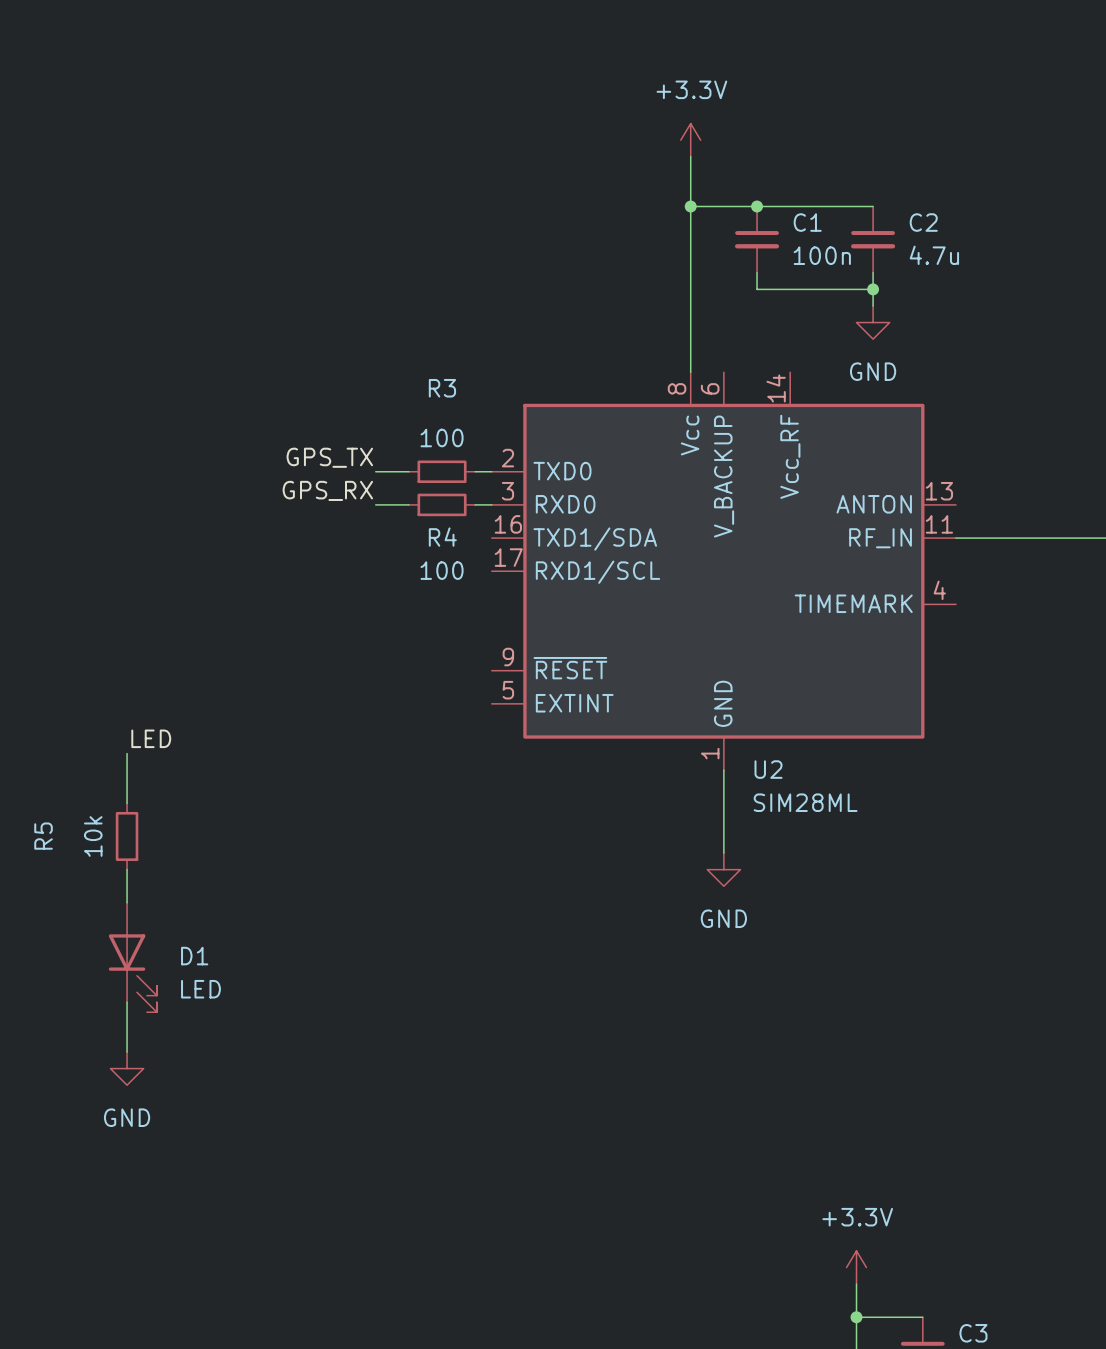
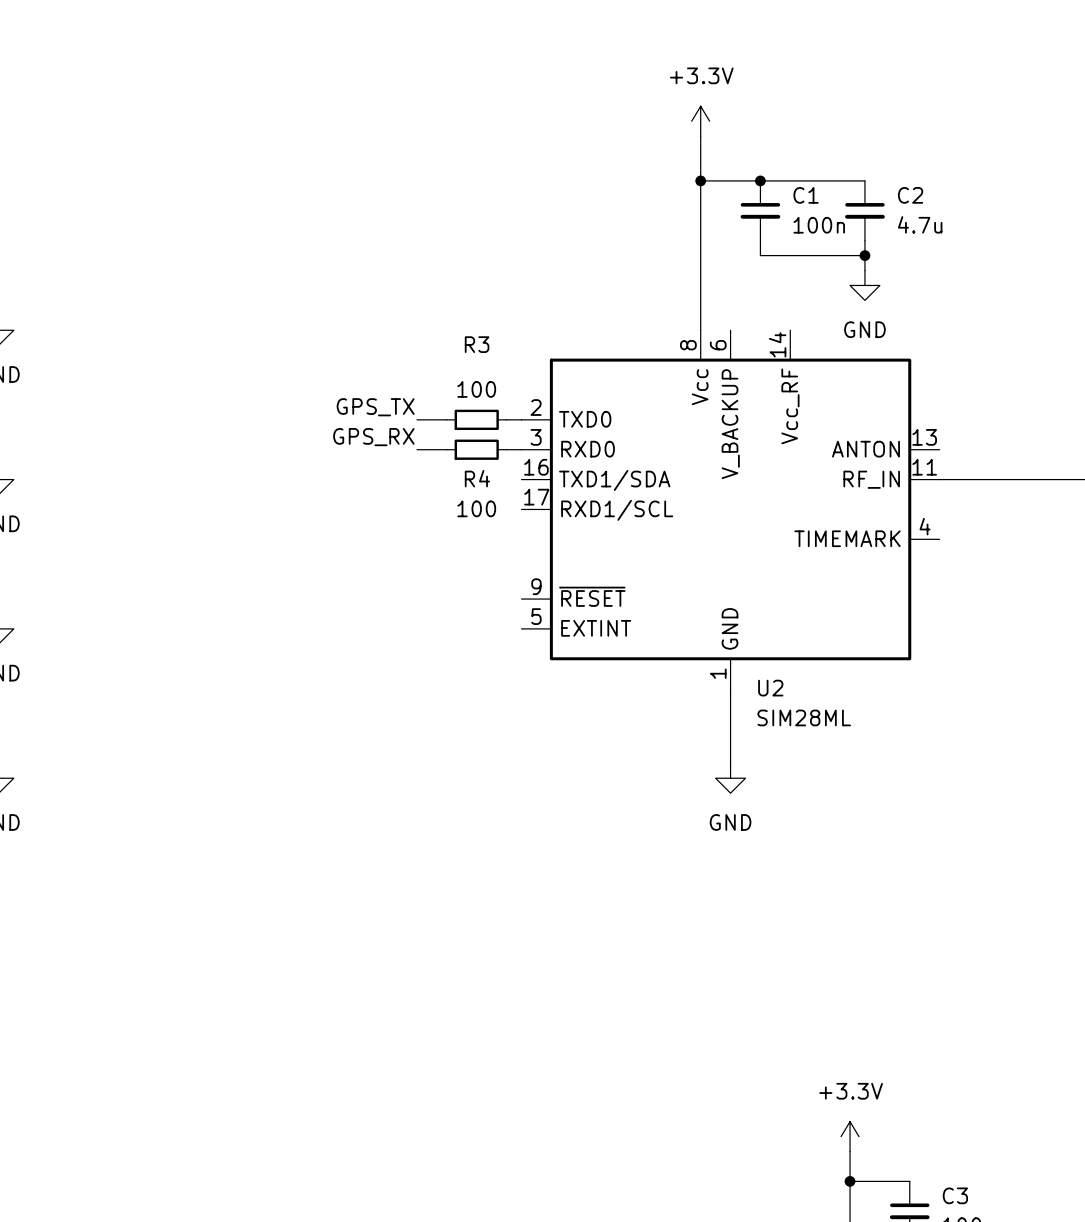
label: LED (151, 738) -> none
wire: (127, 753) (127, 803) -> none
R5: 10k (127, 836) -> none
wire: (127, 869) (127, 902) -> none
D1: LED (132, 957) -> none
wire: (127, 1002) (127, 1052) -> none
power symbol: GND (127, 1068) -> none

